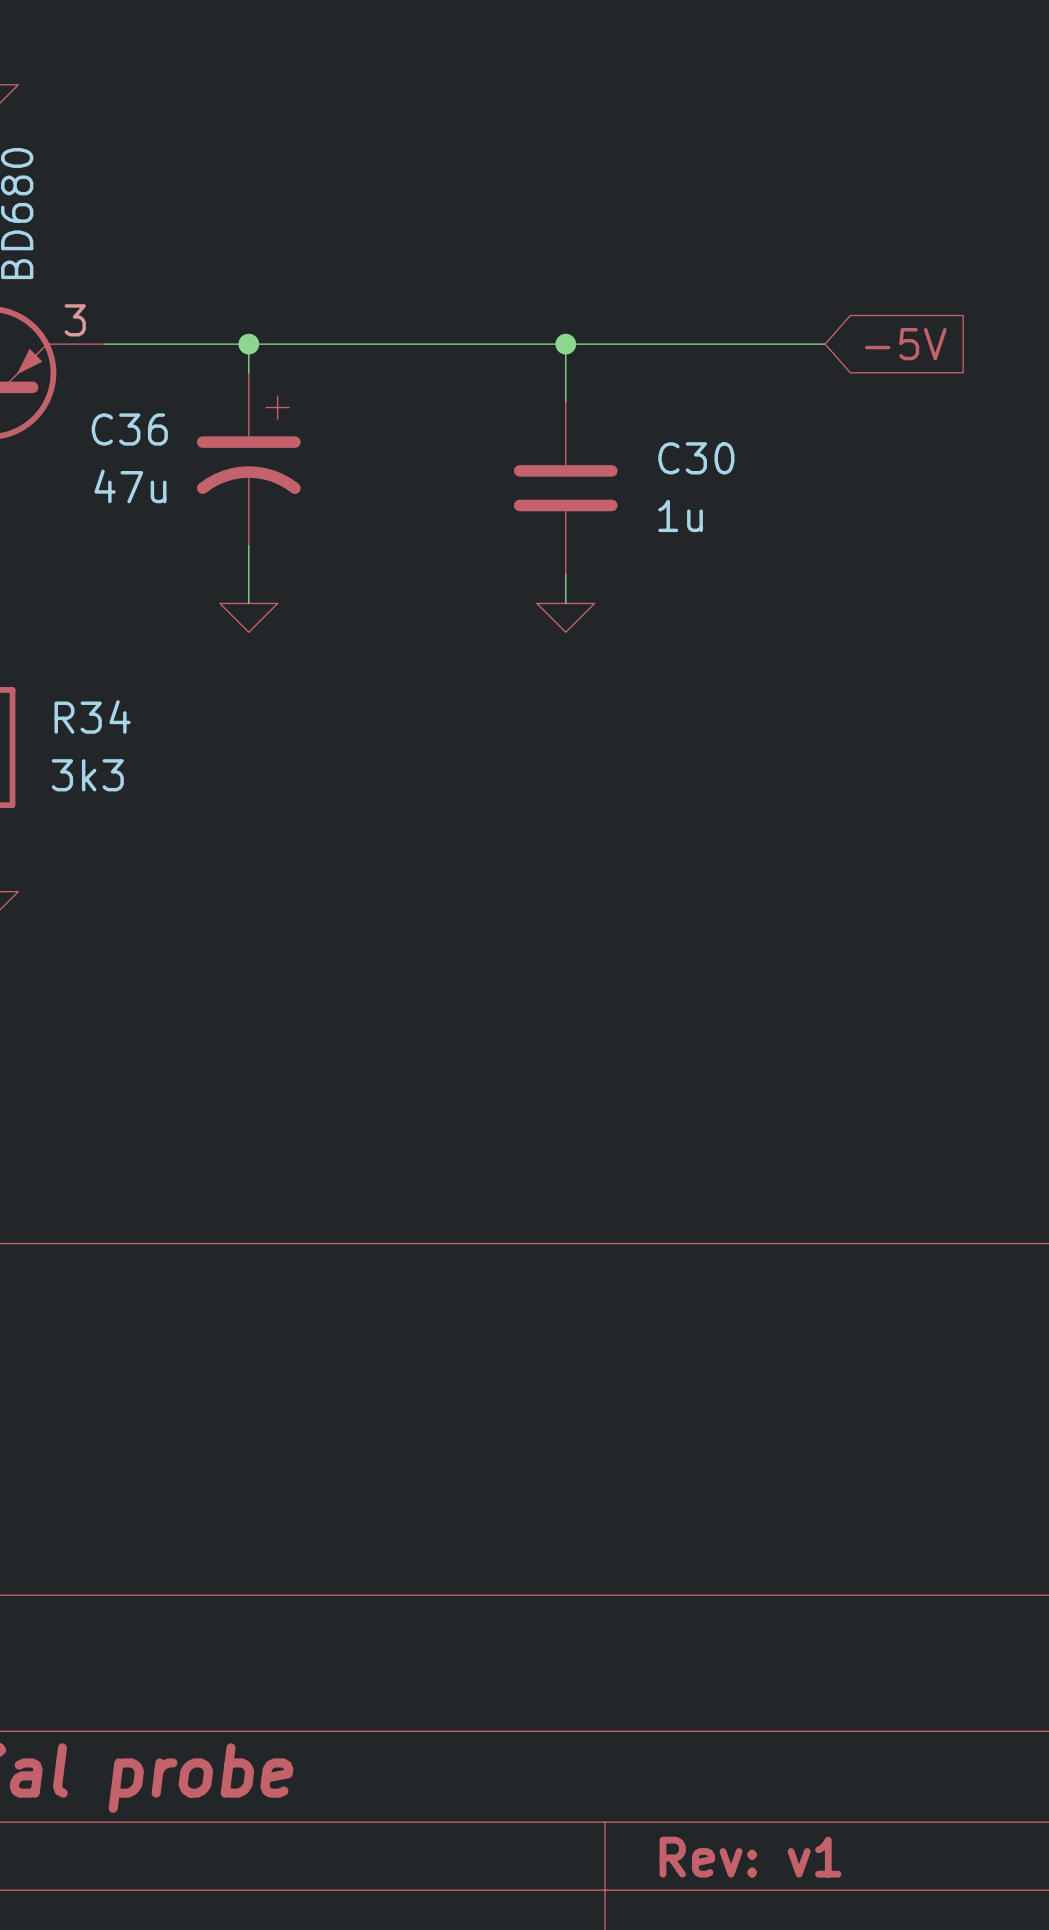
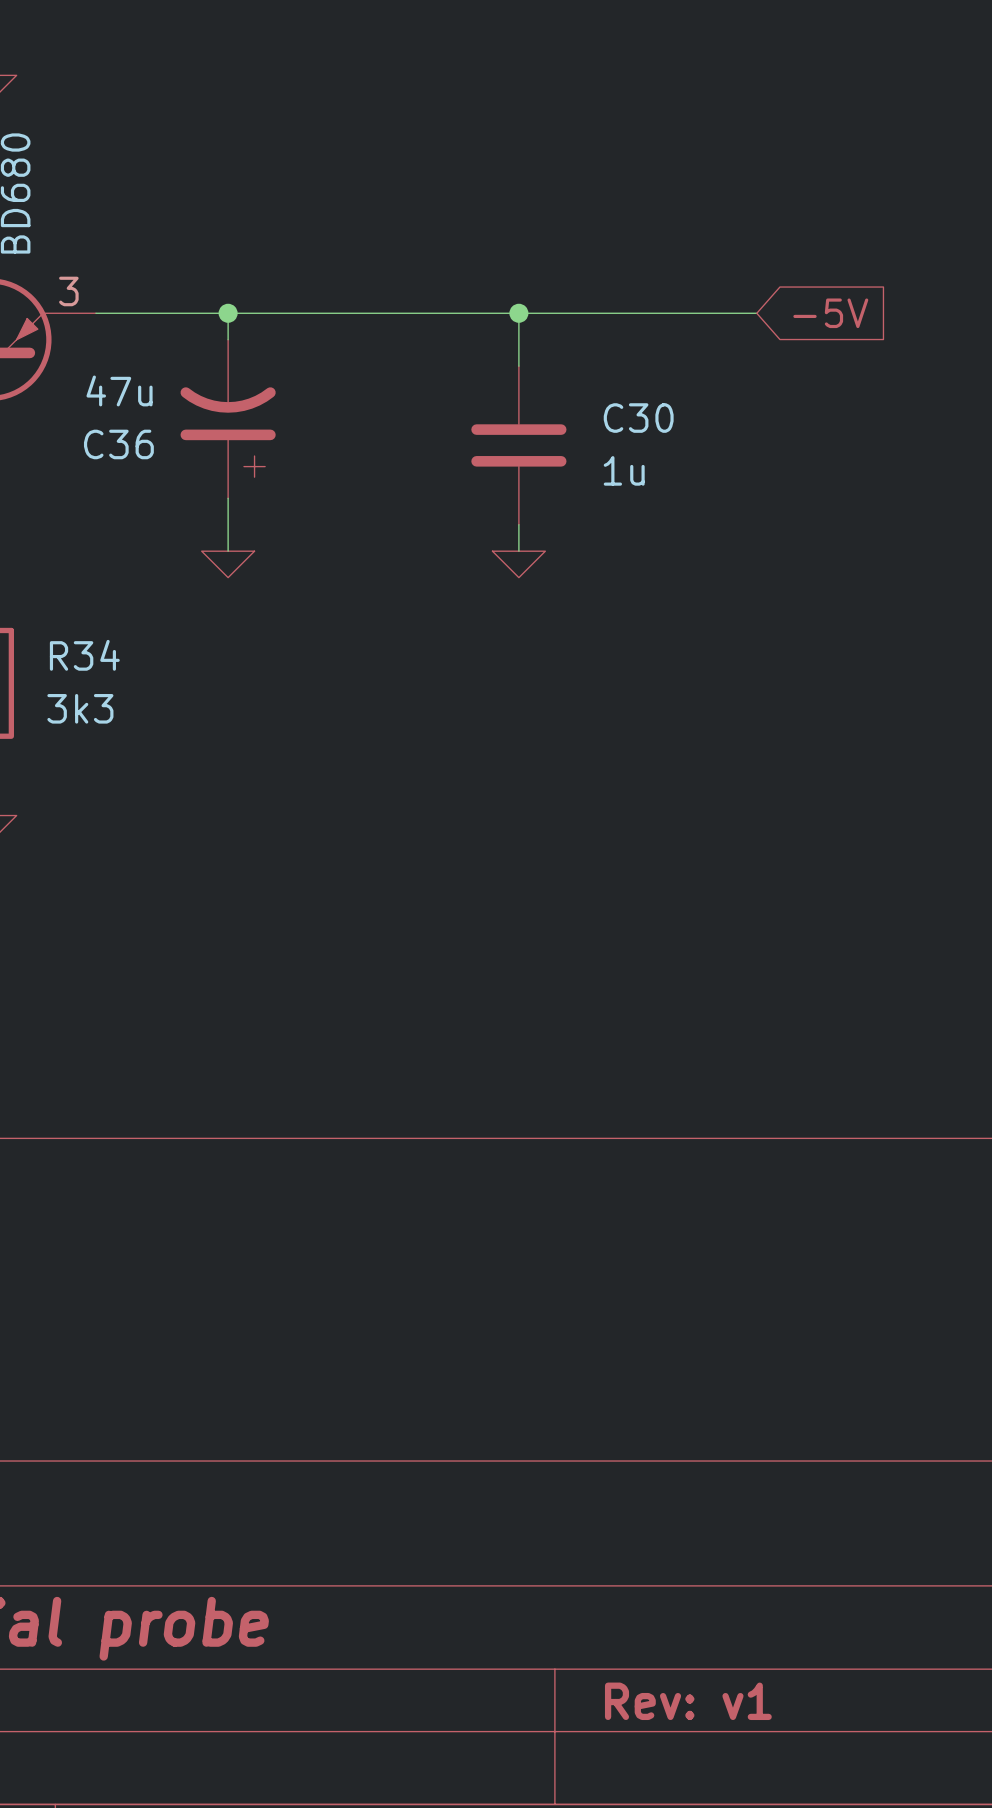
C36 flip: as is (248, 444) -> up-down (228, 432)

